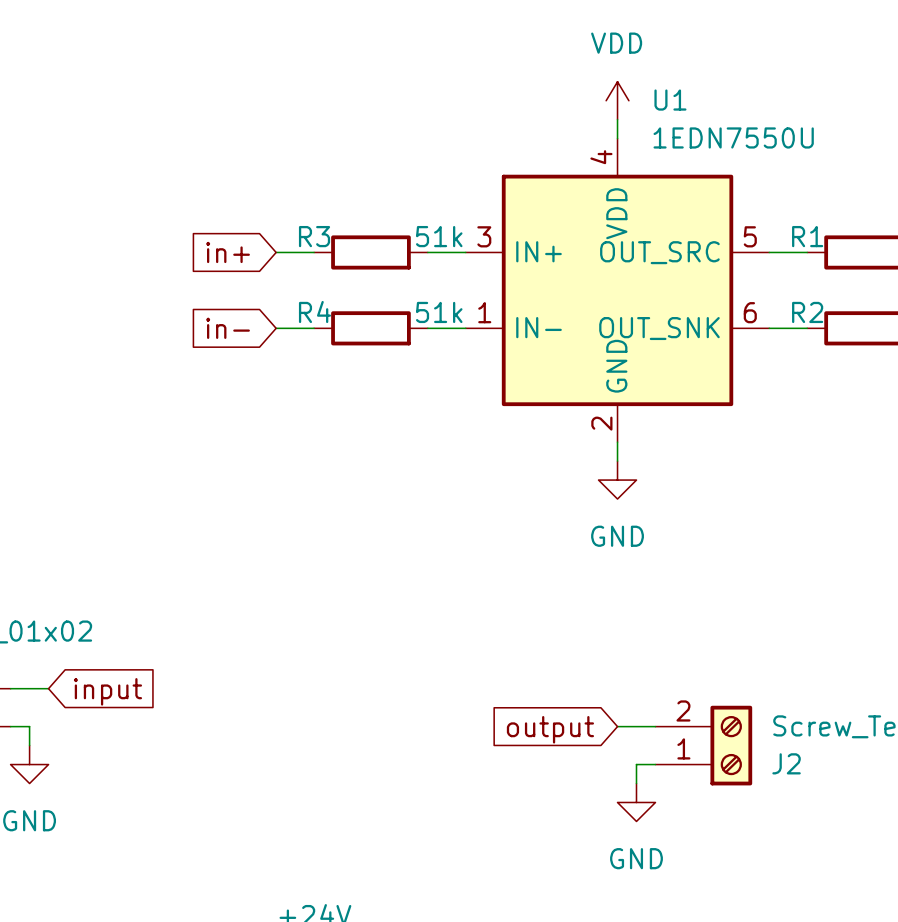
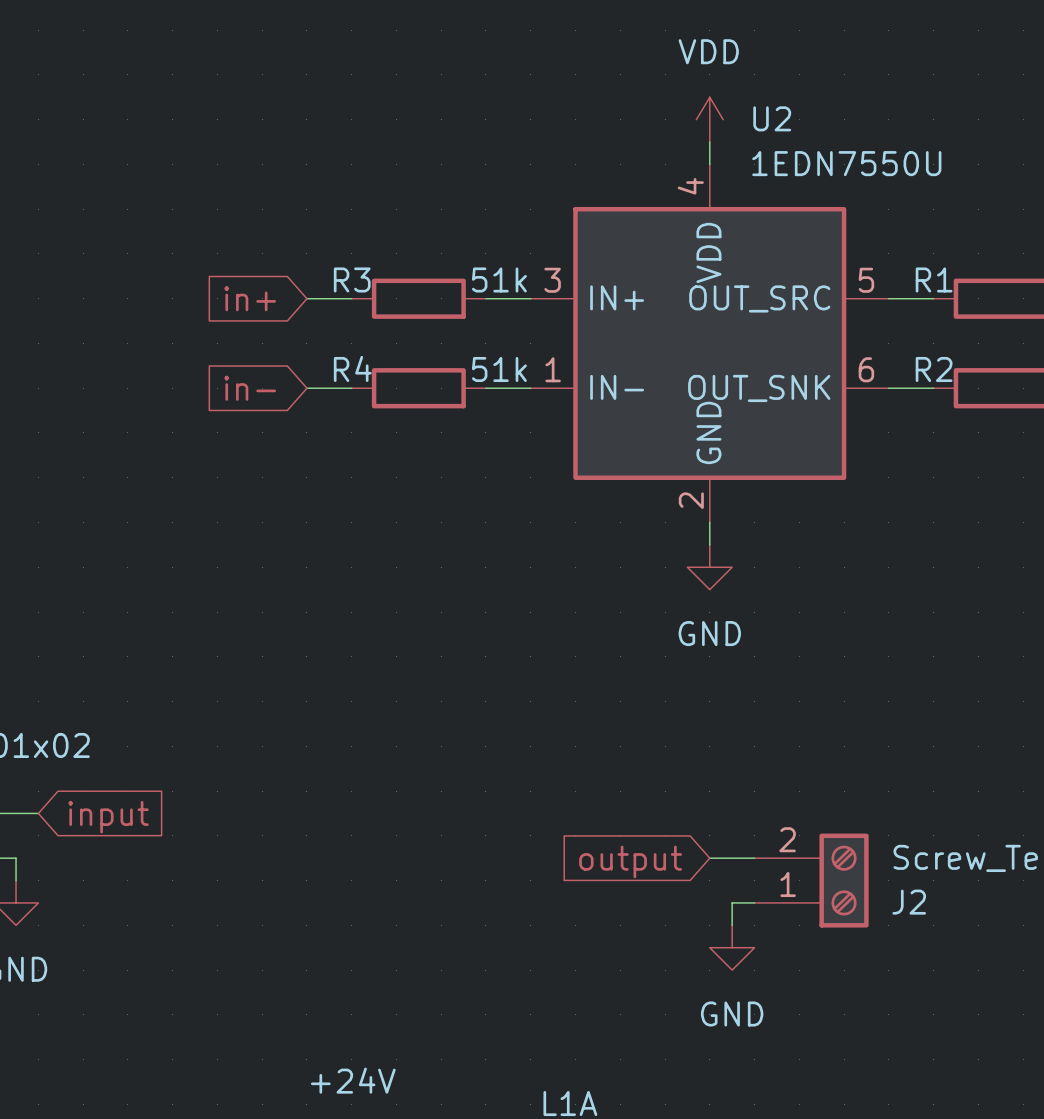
U1 name: U1 (670, 100) -> U2 (772, 118)

